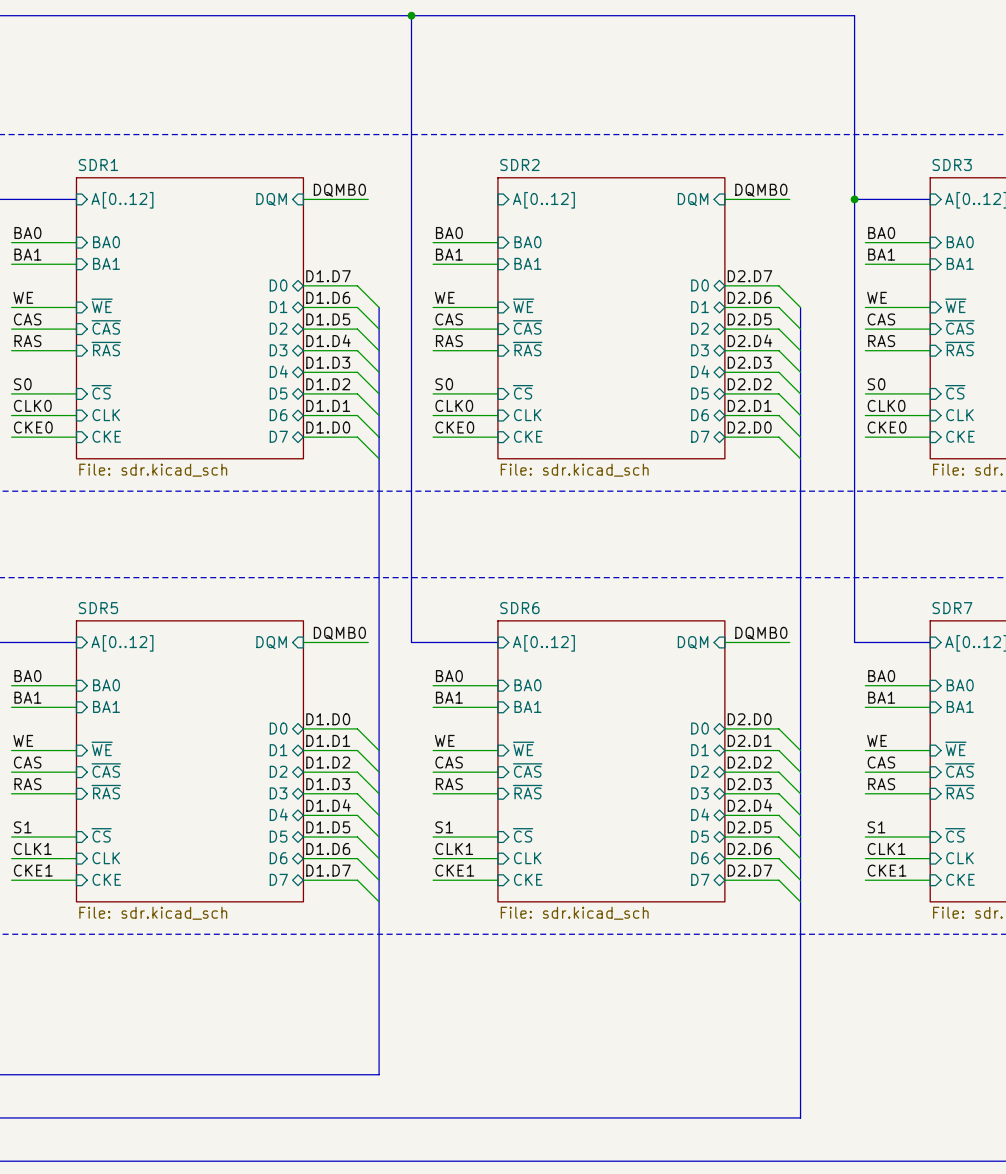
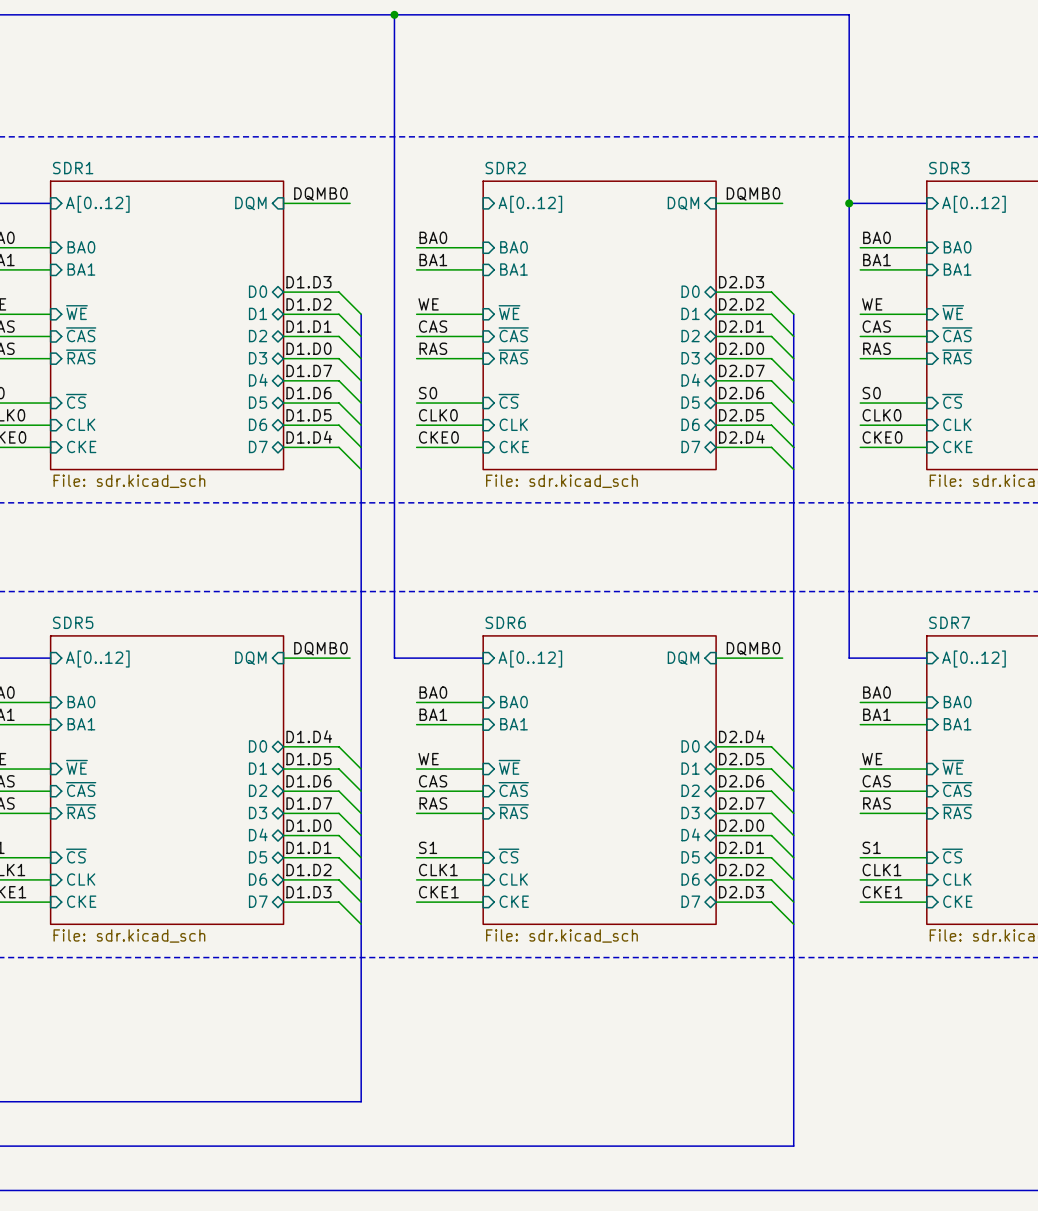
label: D1.D7 (328, 276) -> D1.D3 (308, 282)
label: D2.D7 (749, 276) -> D2.D3 (741, 282)
label: D1.D6 (328, 297) -> D1.D2 (308, 304)
label: D2.D6 (749, 297) -> D2.D2 (741, 304)
label: D1.D5 (328, 319) -> D1.D1 (308, 326)
label: D2.D5 (749, 319) -> D2.D1 (741, 326)
label: D1.D4 (328, 340) -> D1.D0 (308, 348)
label: D2.D4 (749, 340) -> D2.D0 (741, 348)
label: D1.D3 (328, 362) -> D1.D7 (309, 370)
label: D2.D3 (749, 362) -> D2.D7 (741, 370)
label: D1.D2 (328, 384) -> D1.D6 (308, 393)
label: D2.D2 (749, 384) -> D2.D6 (741, 393)
label: D1.D1 (328, 405) -> D1.D5 (308, 415)
label: D2.D1 (749, 405) -> D2.D5 (741, 415)
label: D1.D0 (328, 427) -> D1.D4 (309, 437)
label: D2.D0 (749, 427) -> D2.D4 (741, 437)
label: D1.D0 (328, 719) -> D1.D4 (309, 736)
label: D2.D0 (749, 719) -> D2.D4 (741, 736)
label: D1.D1 (328, 740) -> D1.D5 (308, 759)
label: D2.D1 (749, 740) -> D2.D5 (741, 759)
label: D1.D2 (328, 762) -> D1.D6 (308, 781)
label: D2.D2 (749, 762) -> D2.D6 (741, 781)
label: D1.D3 (328, 784) -> D1.D7 (309, 803)
label: D2.D3 (749, 784) -> D2.D7 (741, 803)
label: D1.D4 (328, 805) -> D1.D0 (308, 825)
label: D2.D4 (749, 805) -> D2.D0 (741, 825)
label: D1.D5 (328, 827) -> D1.D1 (308, 847)
label: D2.D5 (749, 827) -> D2.D1 (741, 847)
label: D1.D6 (328, 848) -> D1.D2 (308, 870)
label: D2.D6 (749, 848) -> D2.D2 (741, 870)
label: D1.D7 (328, 870) -> D1.D3 (308, 892)
label: D2.D7 (749, 870) -> D2.D3 (741, 892)

